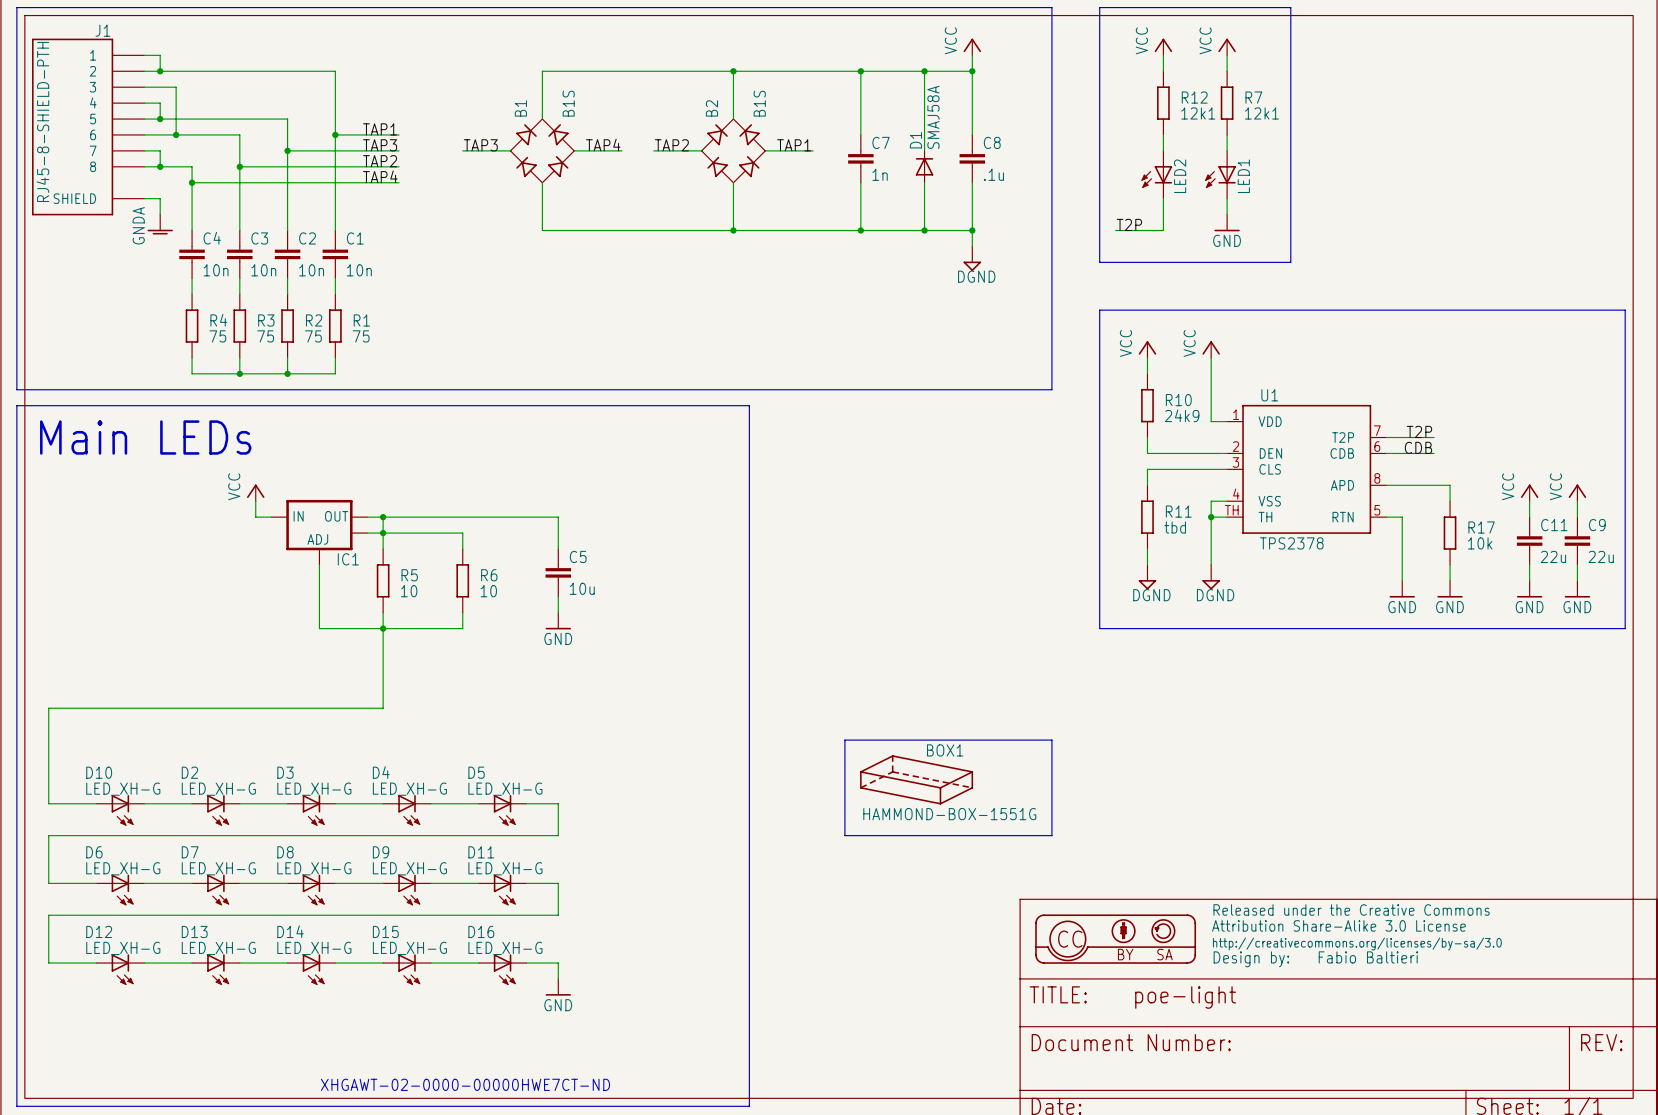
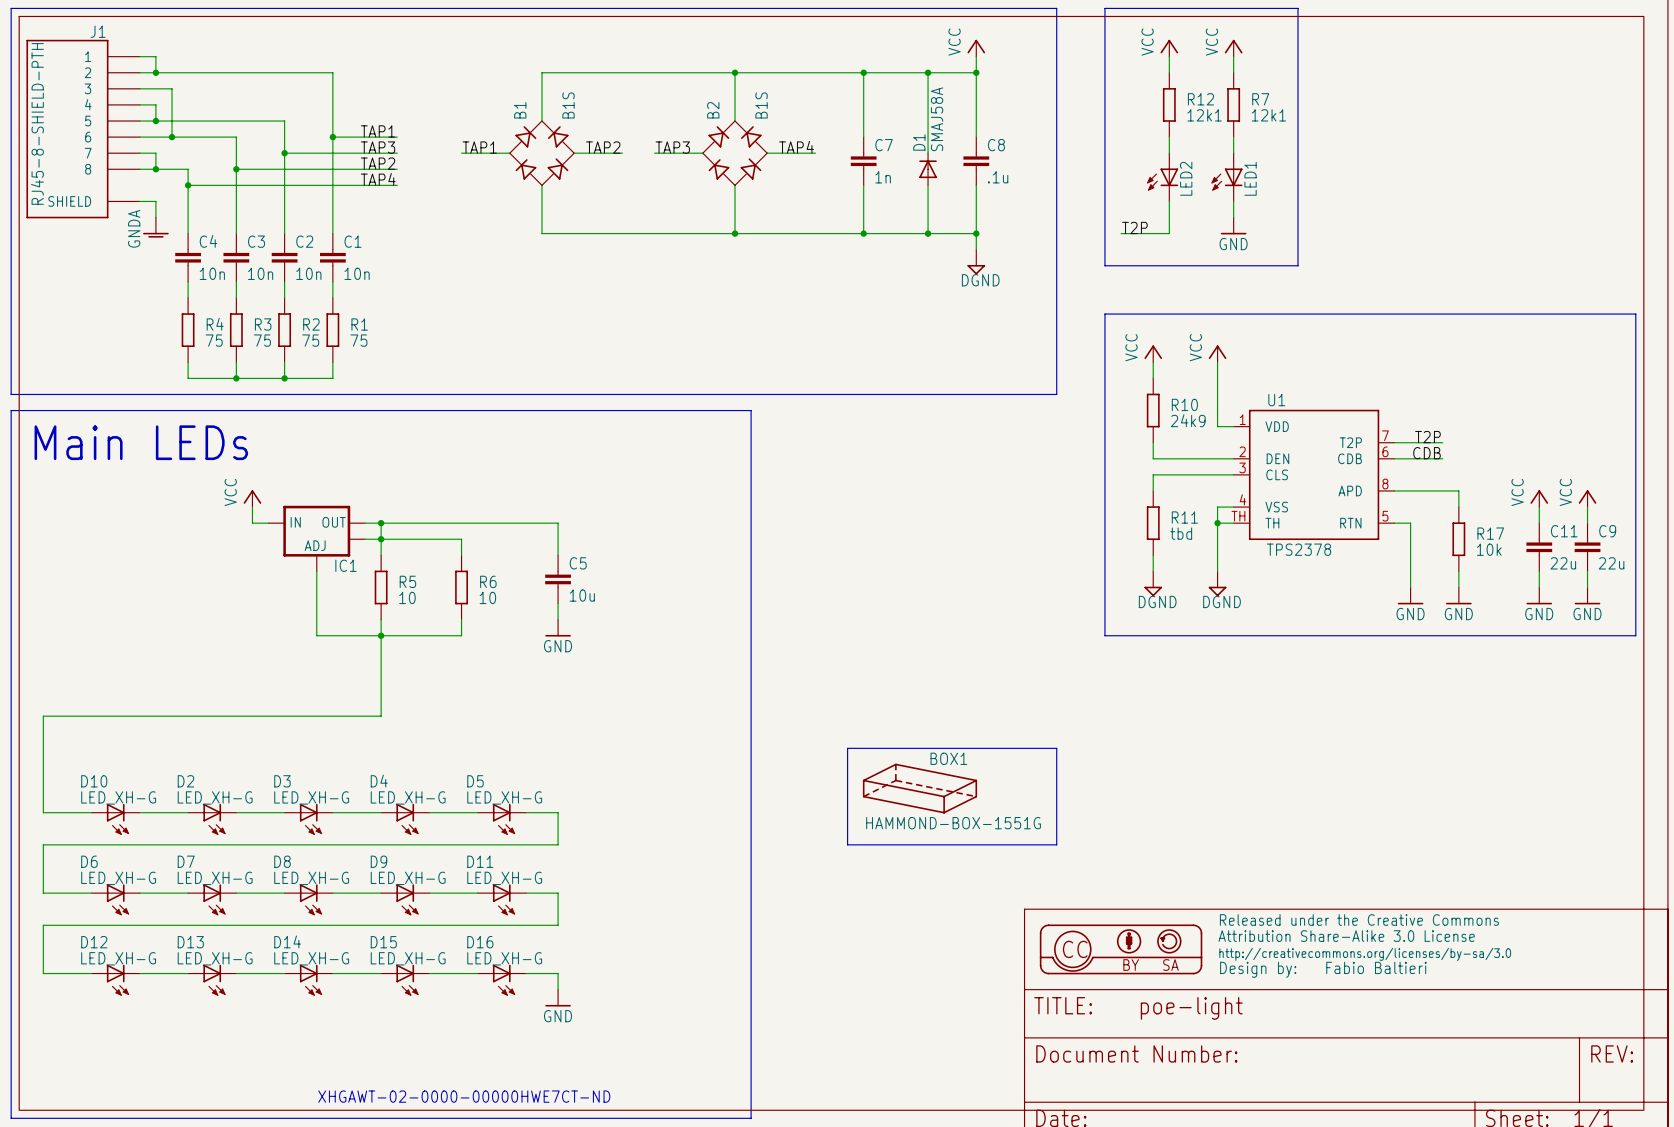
label: TAP3 (480, 145) -> TAP1 (479, 147)
label: TAP4 (603, 145) -> TAP2 (603, 147)
label: TAP2 (671, 145) -> TAP3 (672, 147)
label: TAP1 (794, 145) -> TAP4 (796, 147)

